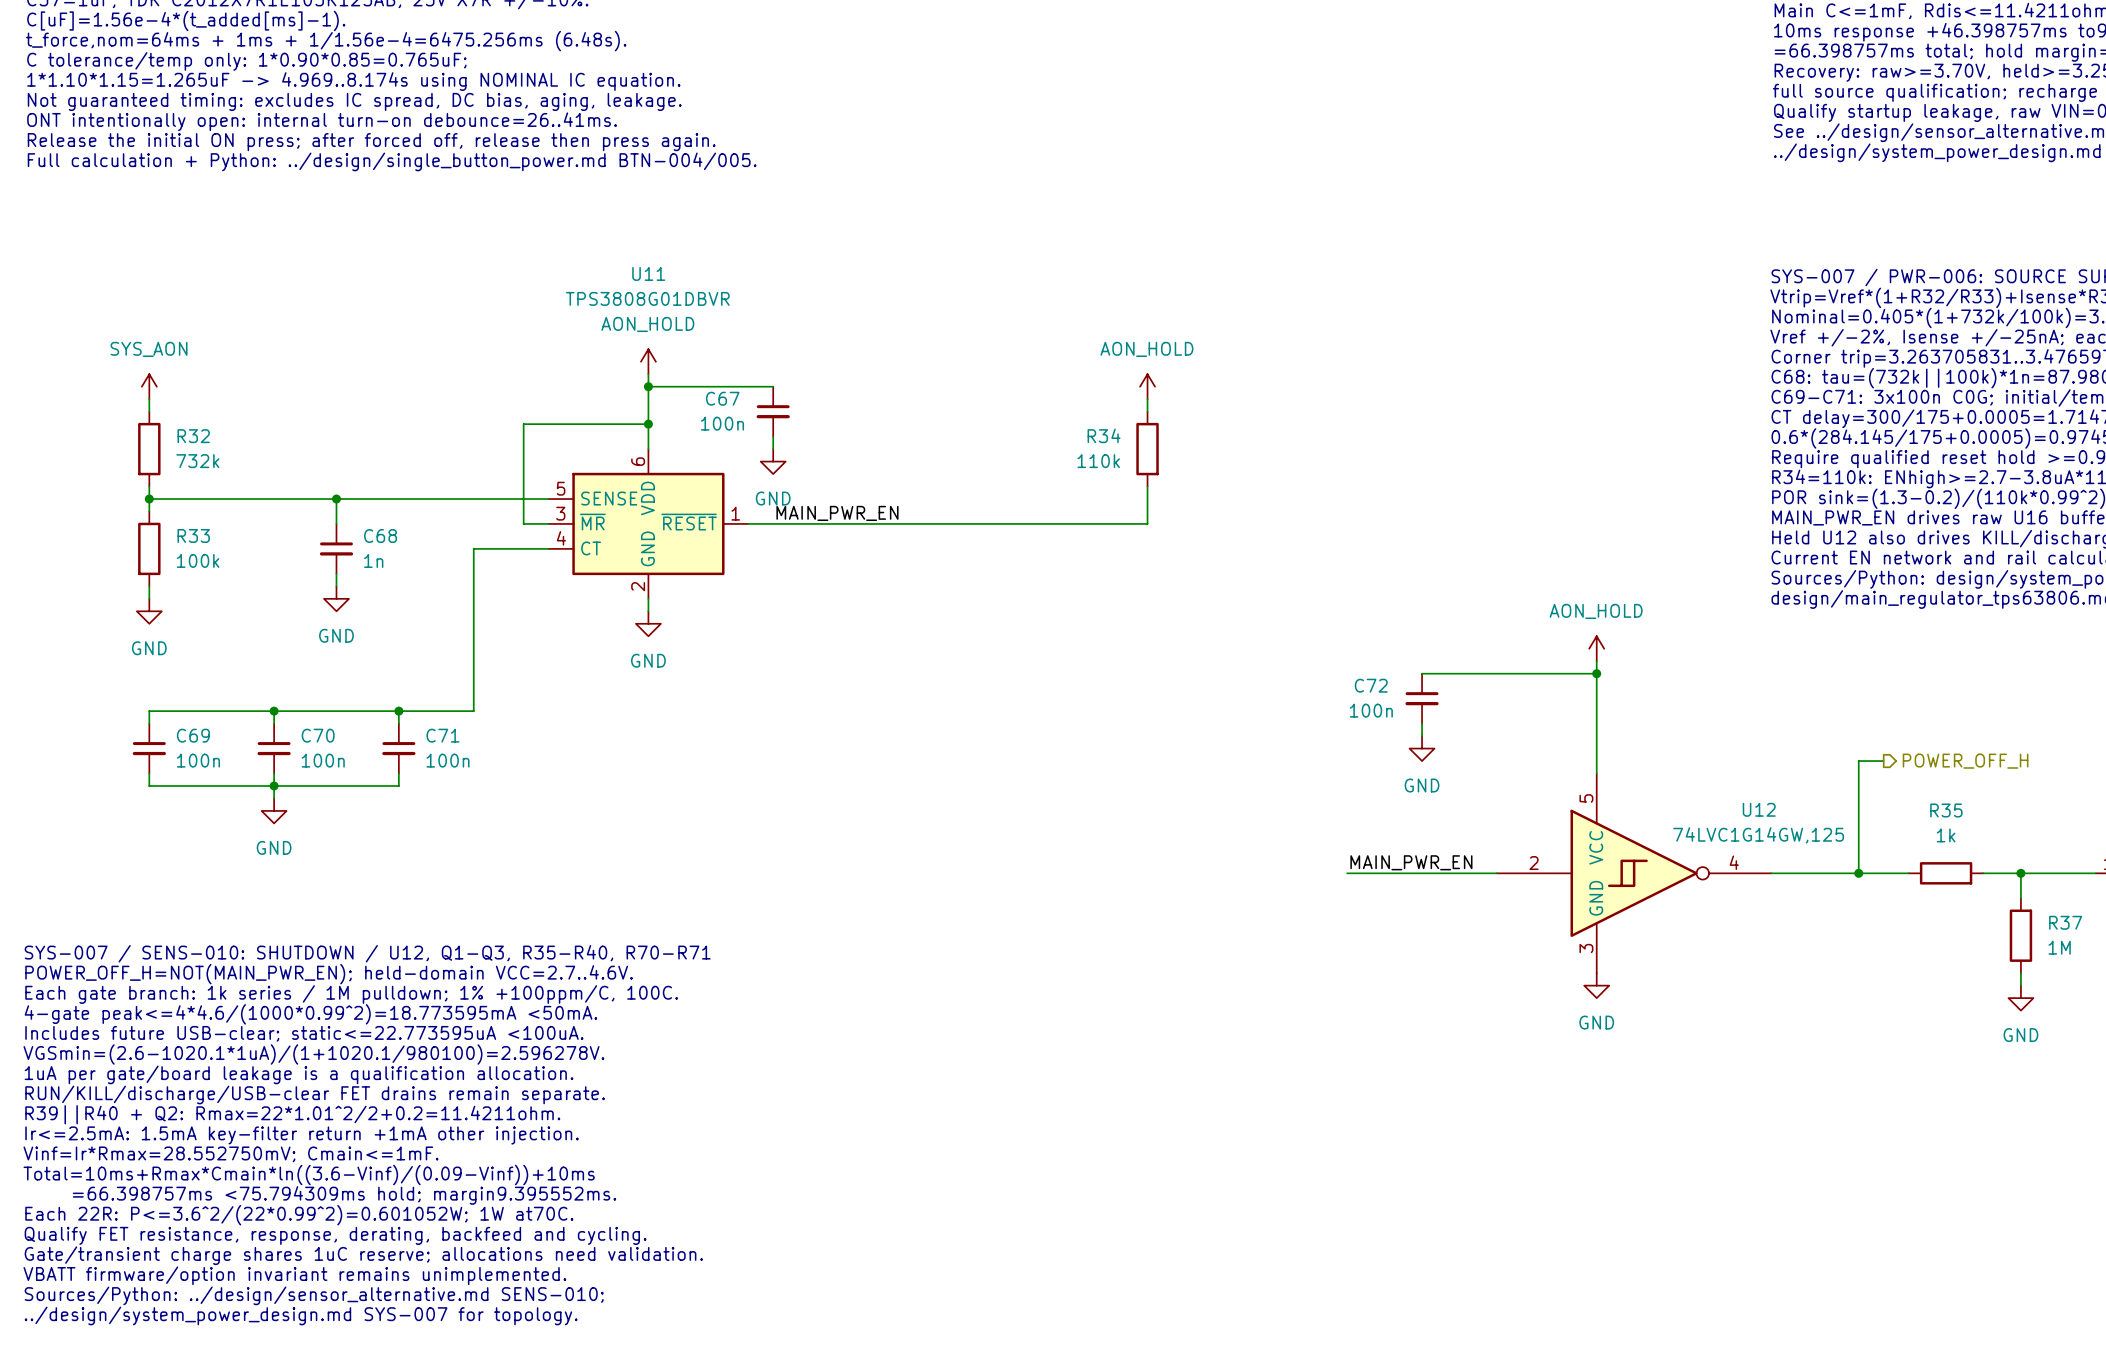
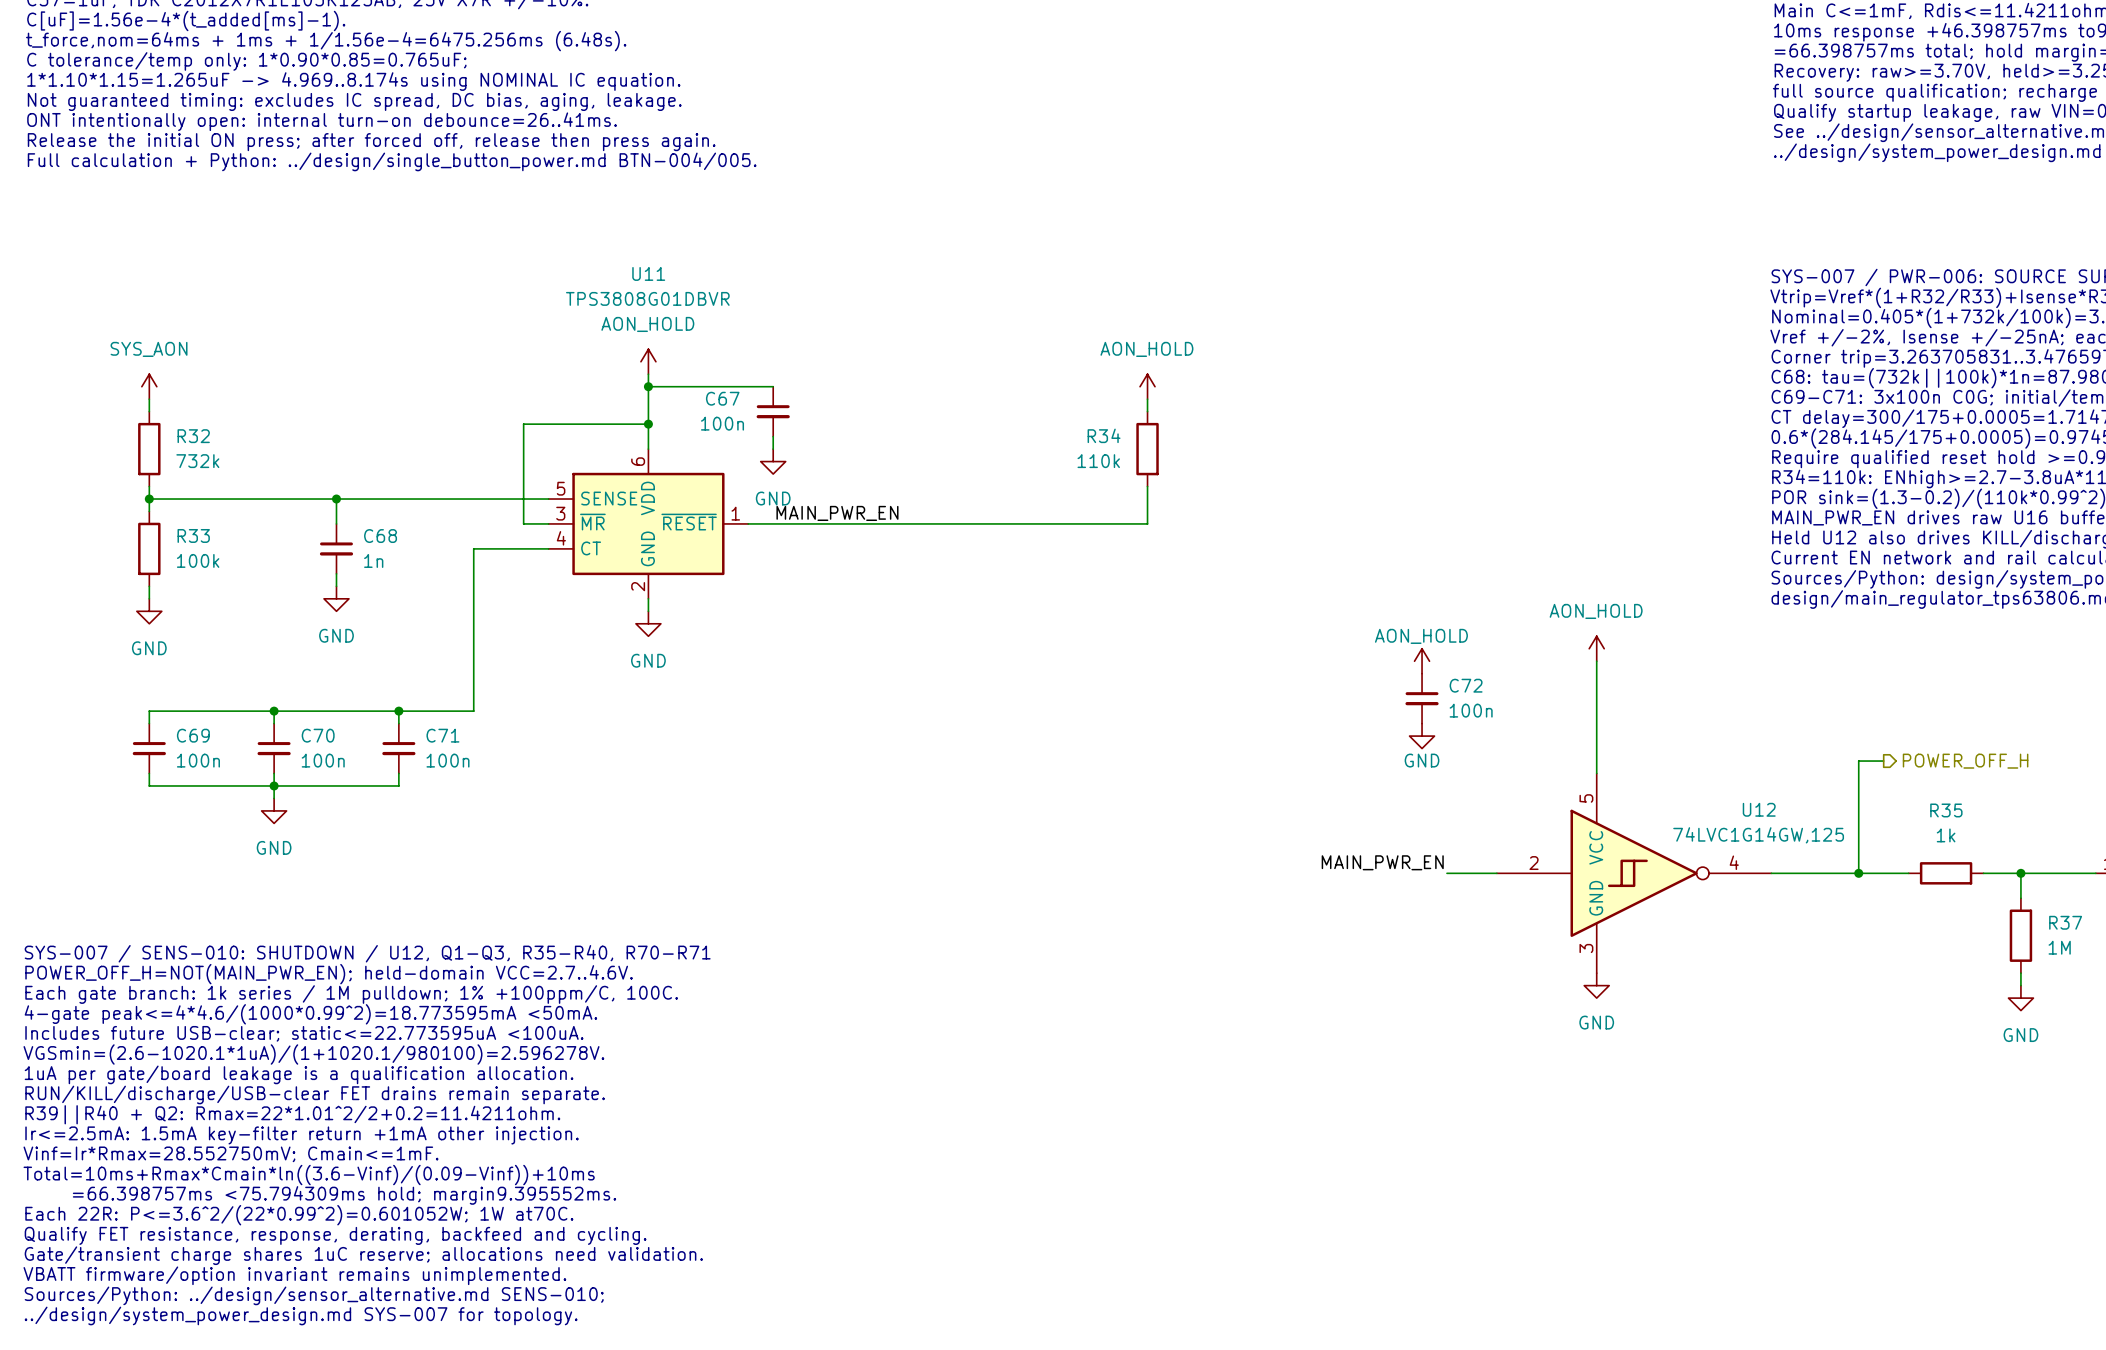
power symbol: none -> AON_HOLD (1422, 661)
wire: (1422, 673) (1596, 673) -> none
junction: (1596, 673) -> none
C72 name position: C72 (1371, 685) -> C72 (1466, 685)
C72 value position: 100n (1371, 710) -> 100n (1471, 710)
power symbol position: GND (1422, 748) -> GND (1422, 736)
power symbol text position: GND (1422, 785) -> GND (1422, 760)
label position: MAIN_PWR_EN (1411, 862) -> MAIN_PWR_EN (1382, 862)
wire: (1347, 873) (1446, 873) -> none

